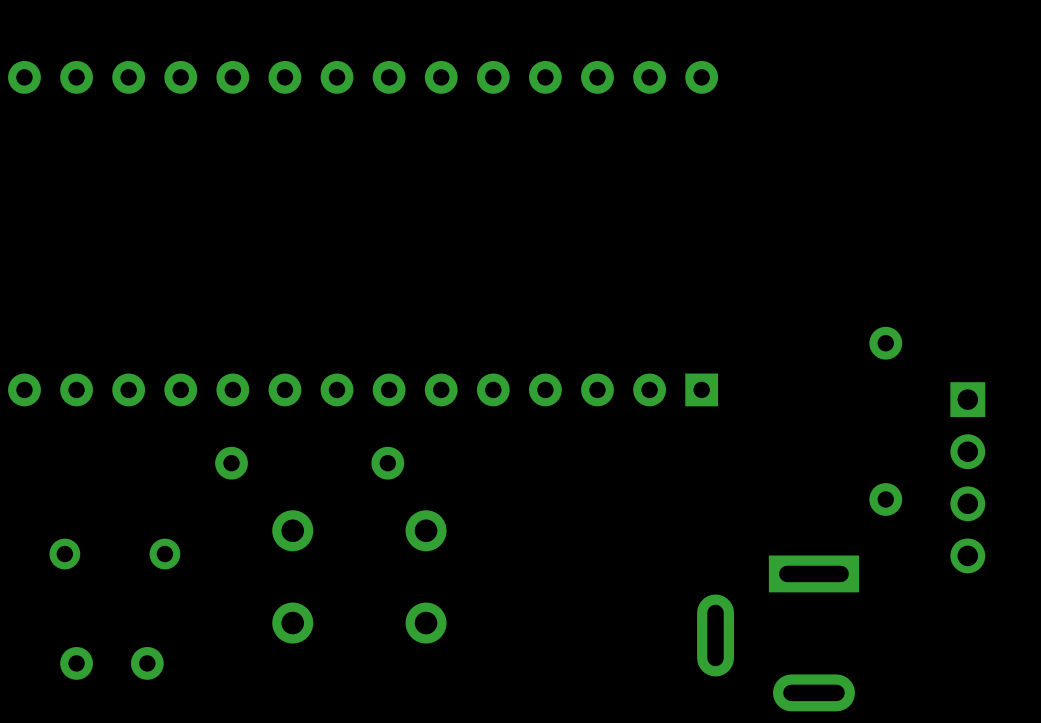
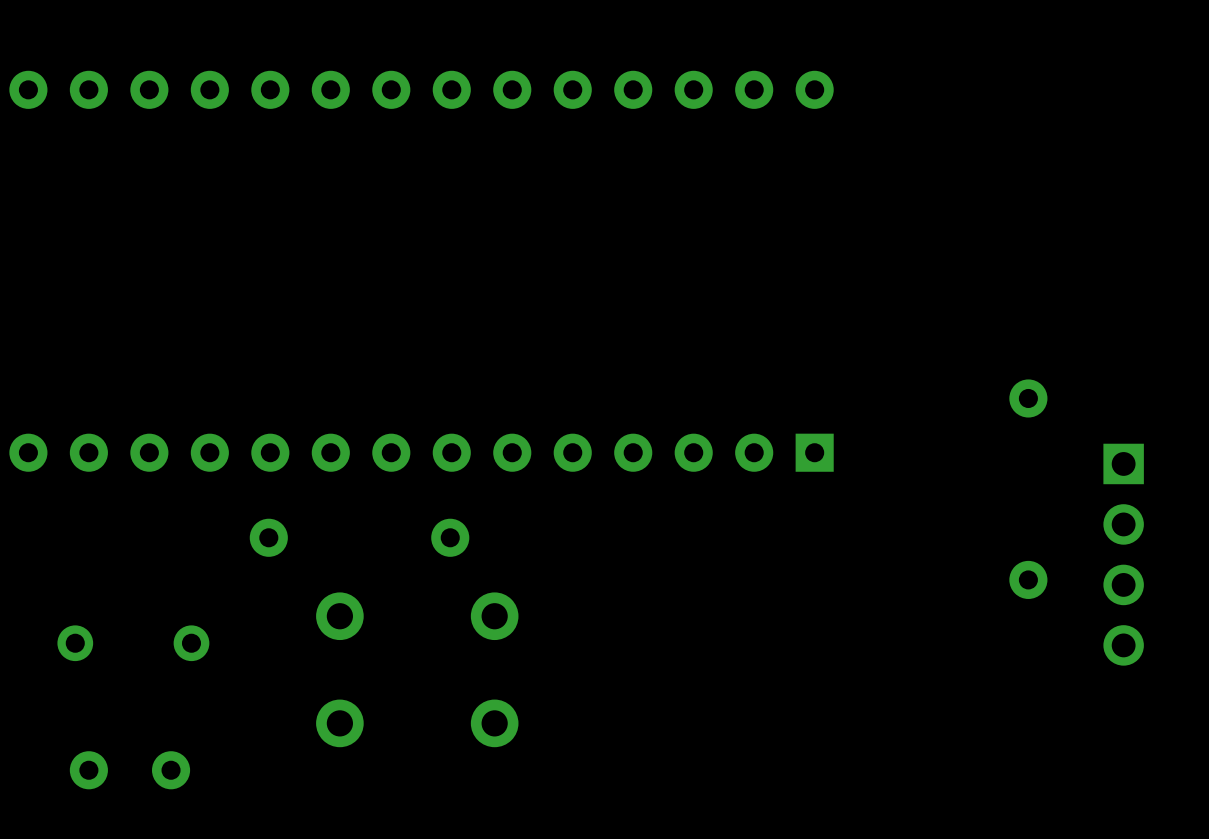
part: (778, 633) -> none

